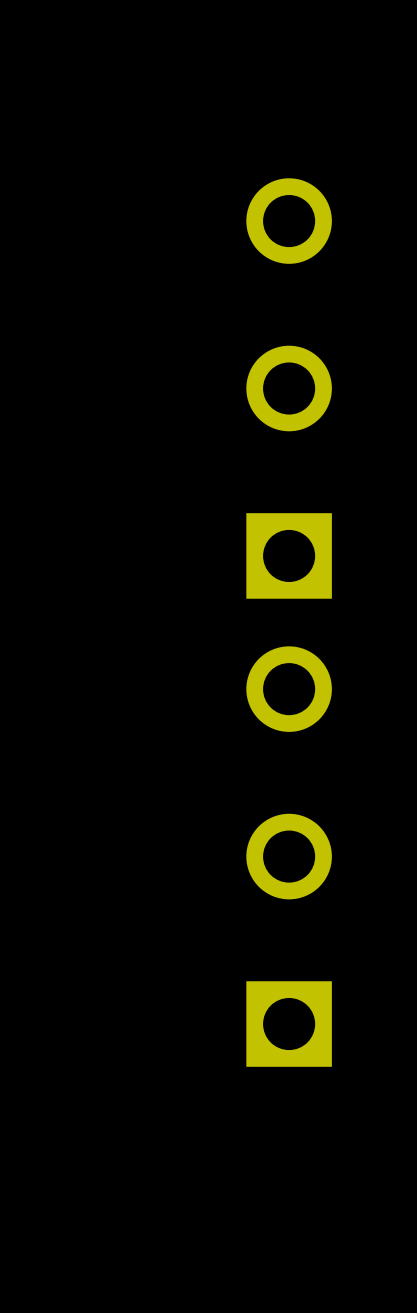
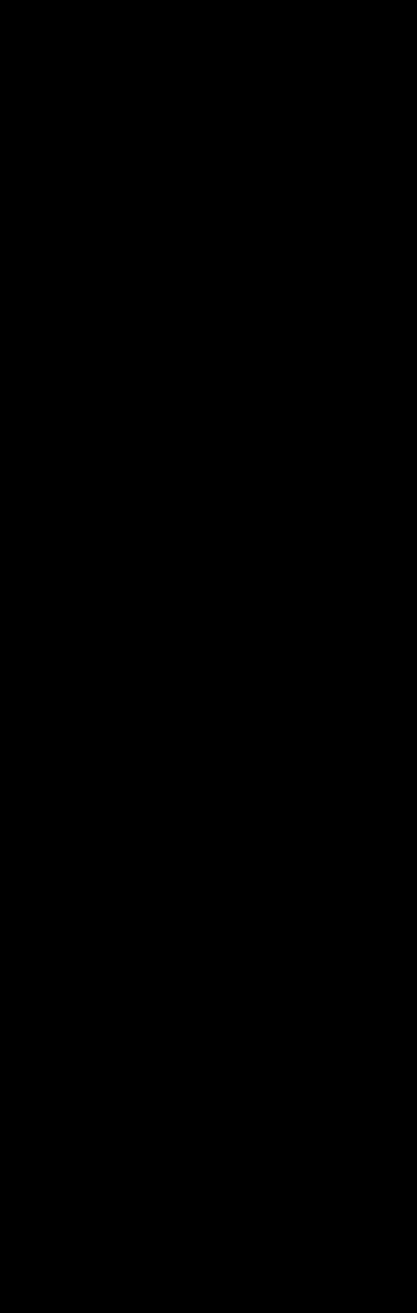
part: (289, 388) -> none
part: (289, 856) -> none

